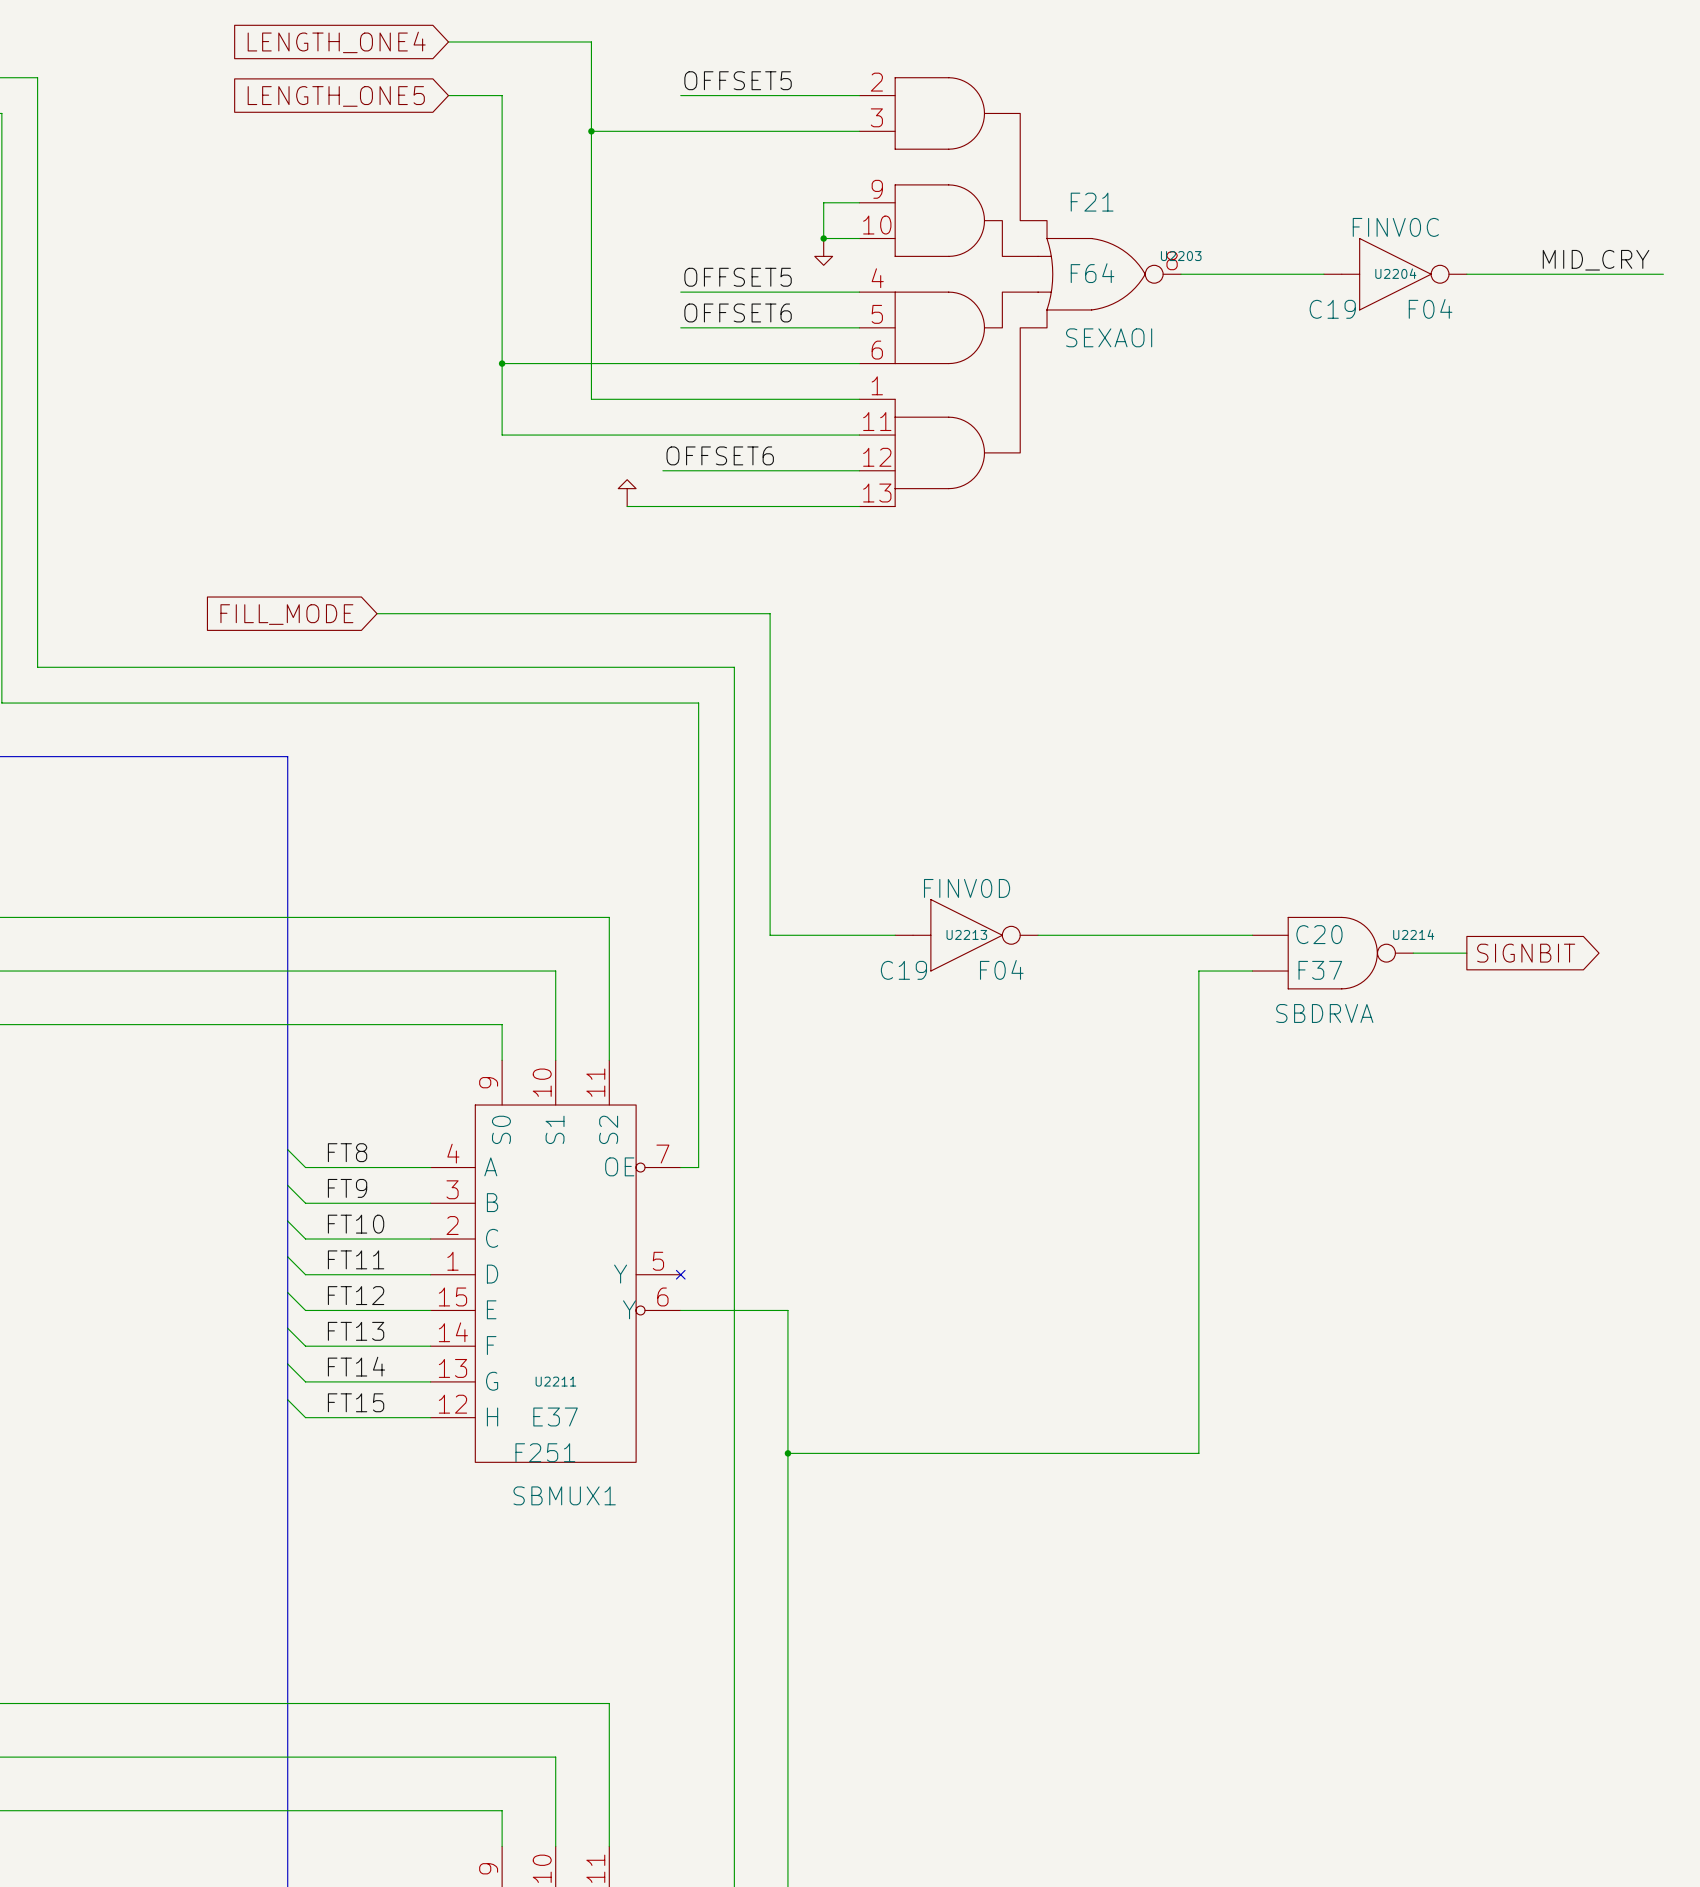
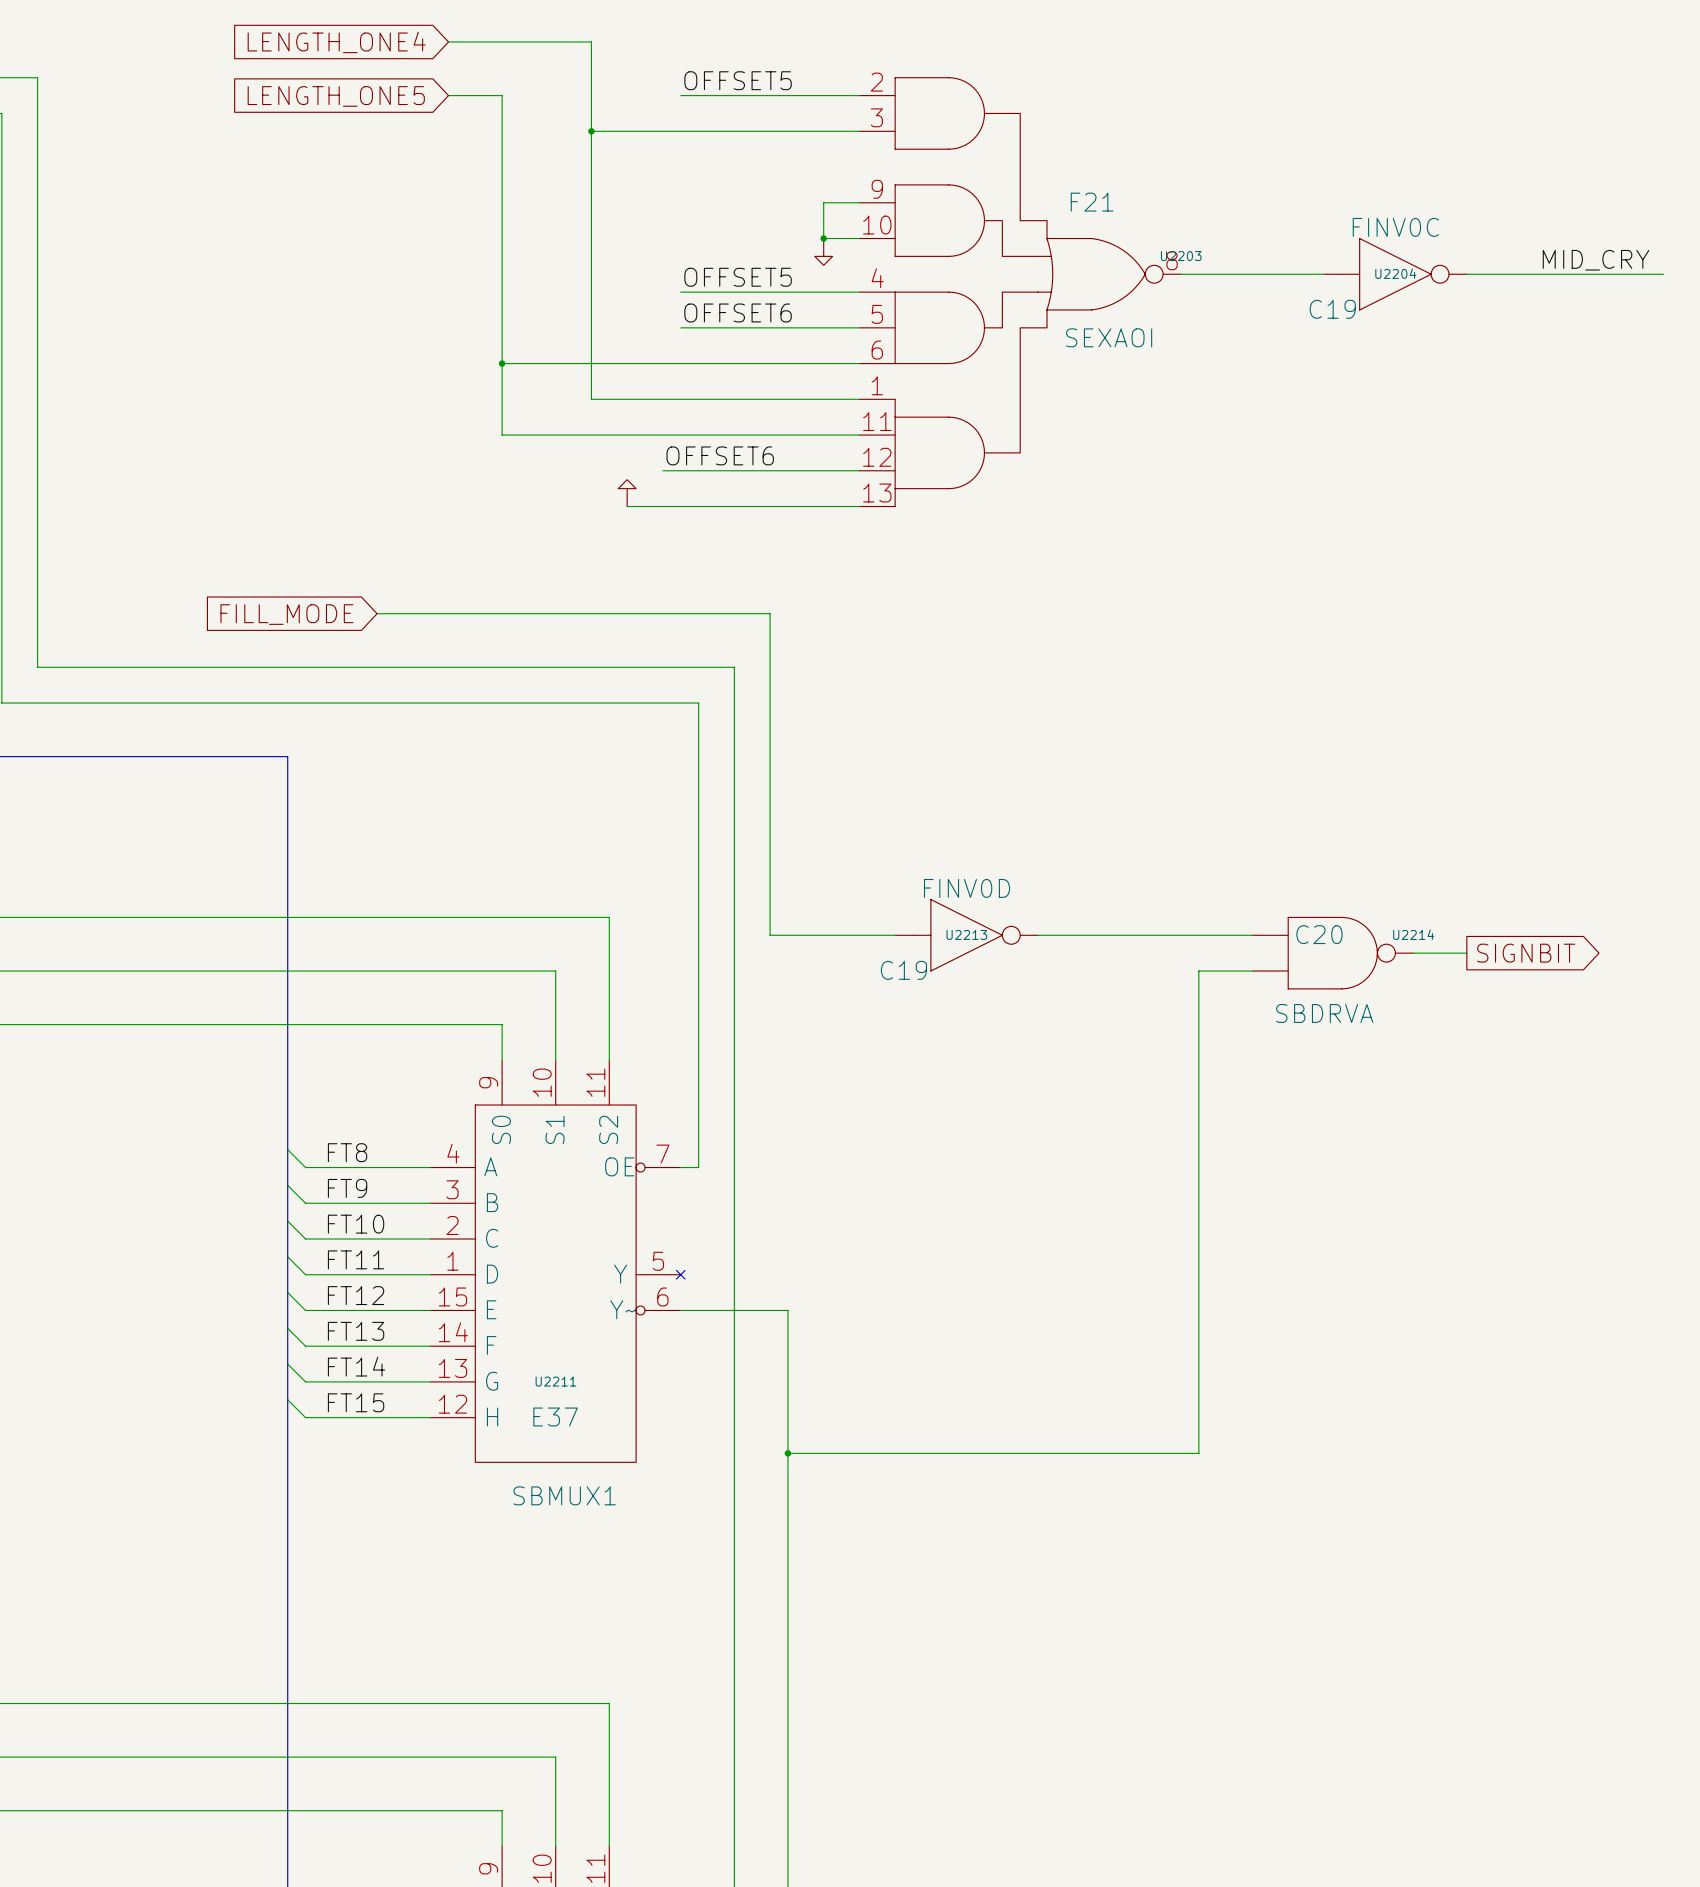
U2203 value: F64 (1092, 273) -> none
U2204 value: F04 (1430, 308) -> none
U2213 value: F04 (1001, 969) -> none
U2214 value: F37 (1320, 970) -> none
U2211 pin name: Y (629, 1309) -> Y~ (622, 1309)
U2211 value: F251 (545, 1452) -> none

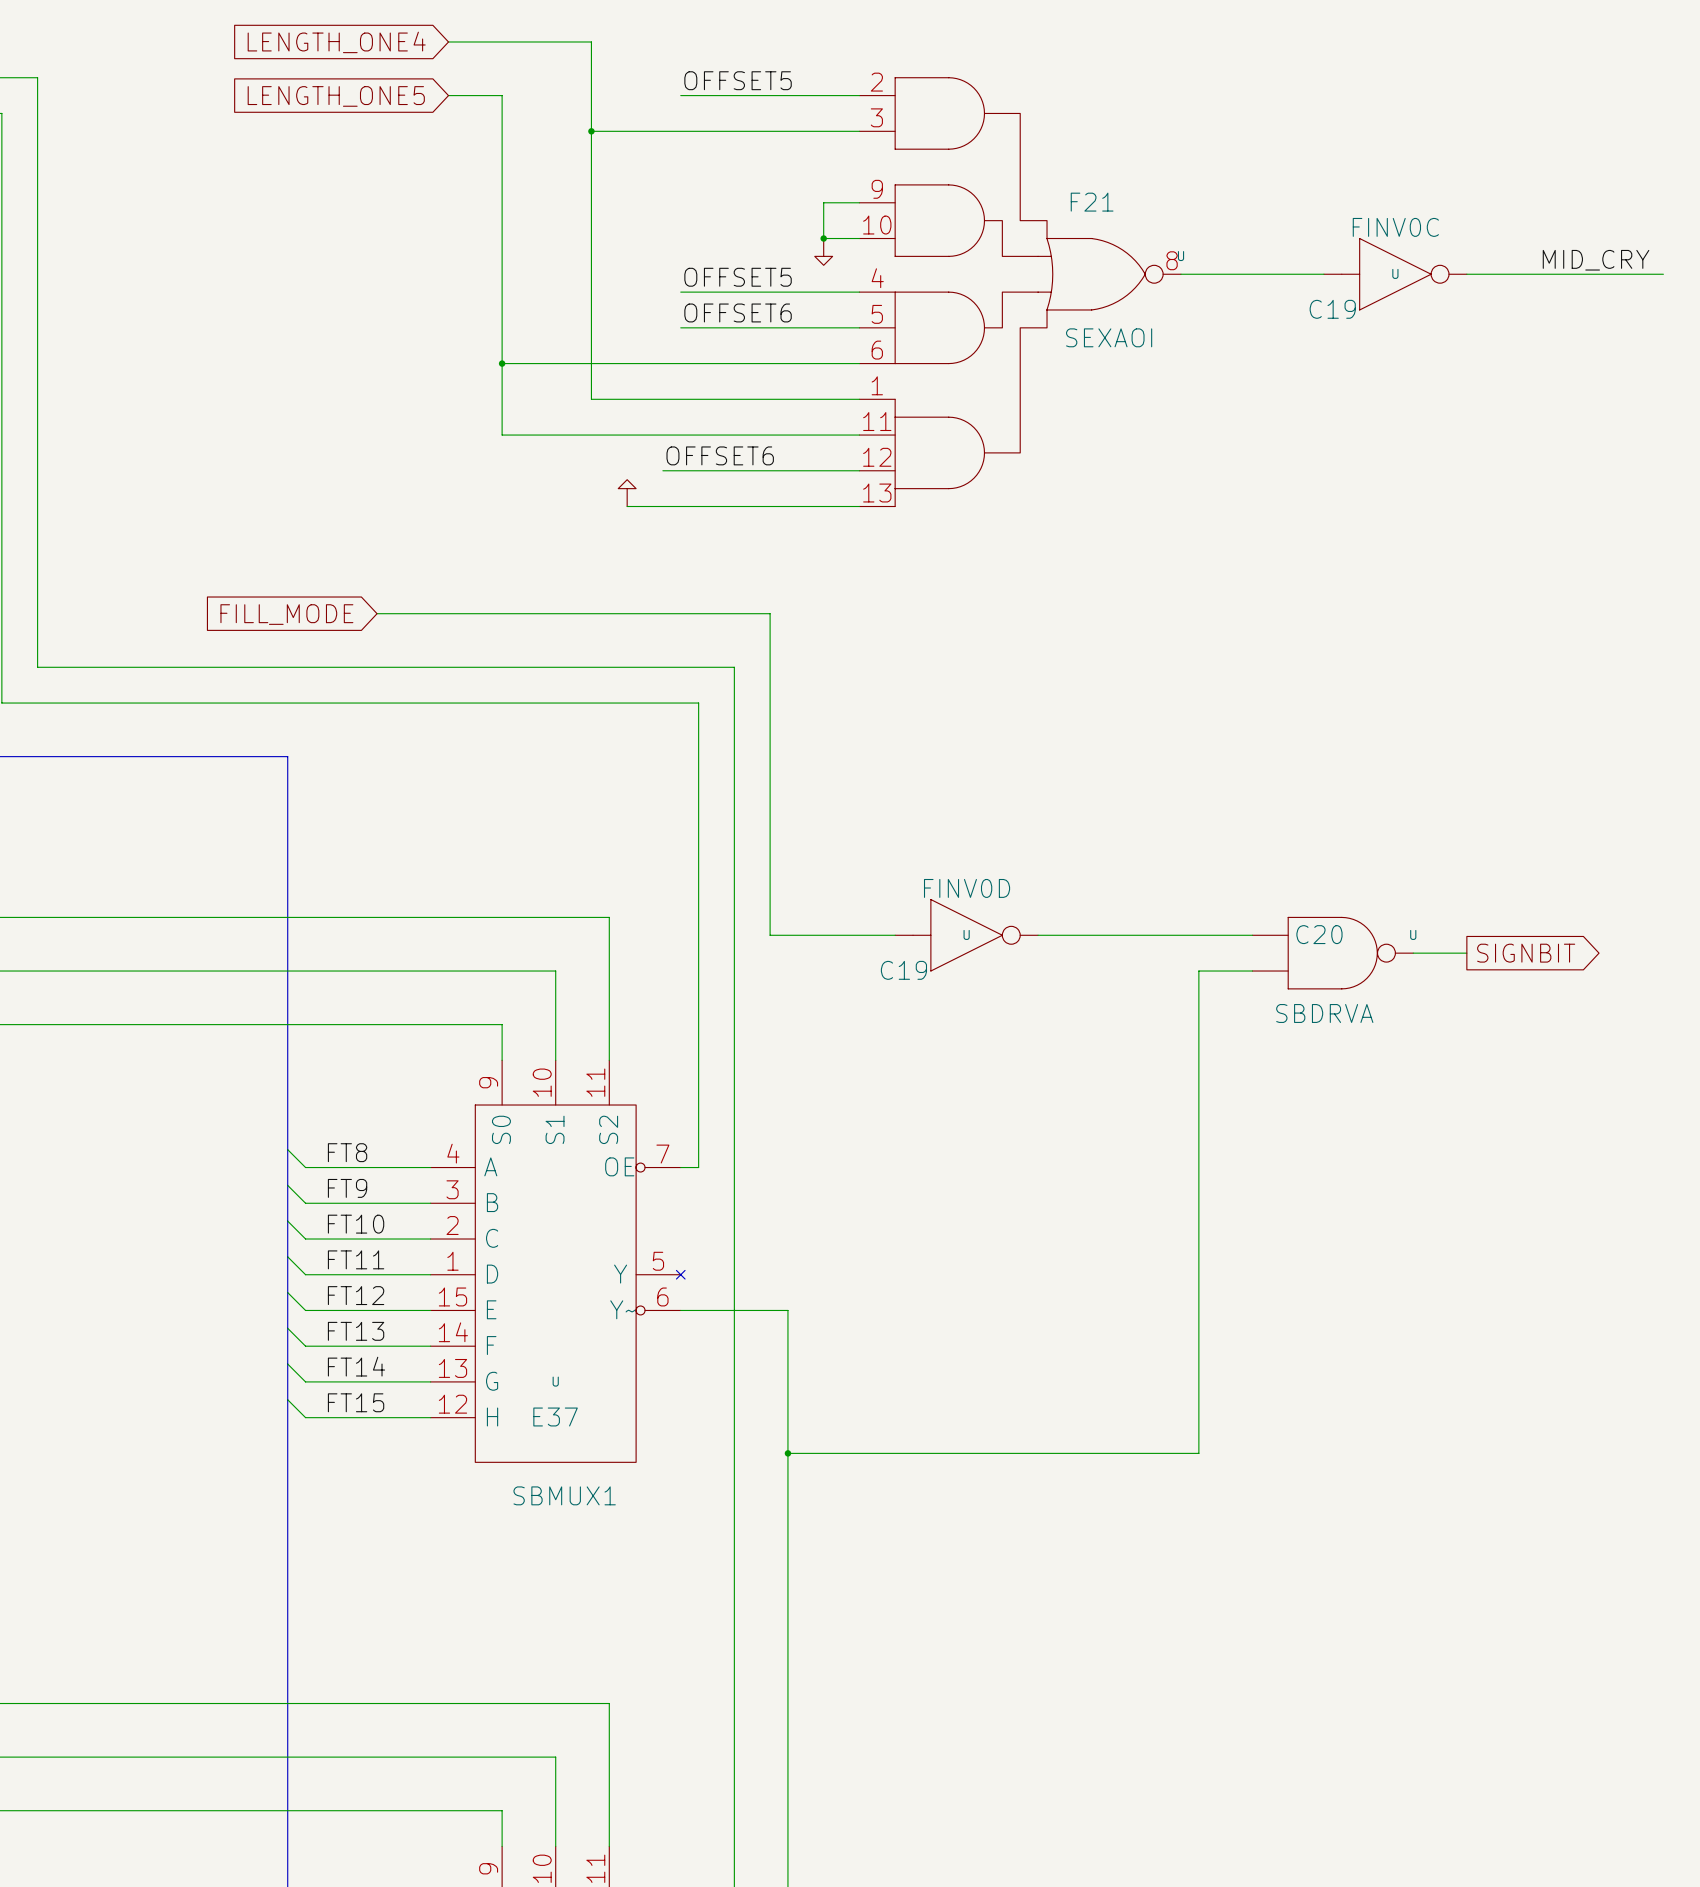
U2203 name: U2203 (1181, 256) -> U (1181, 256)
U2204 name: U2204 (1395, 273) -> U (1395, 273)
U2213 name: U2213 (966, 934) -> U (966, 934)
U2214 name: U2214 (1413, 934) -> U (1413, 934)
U2211 name: U2211 (555, 1381) -> U (555, 1381)

